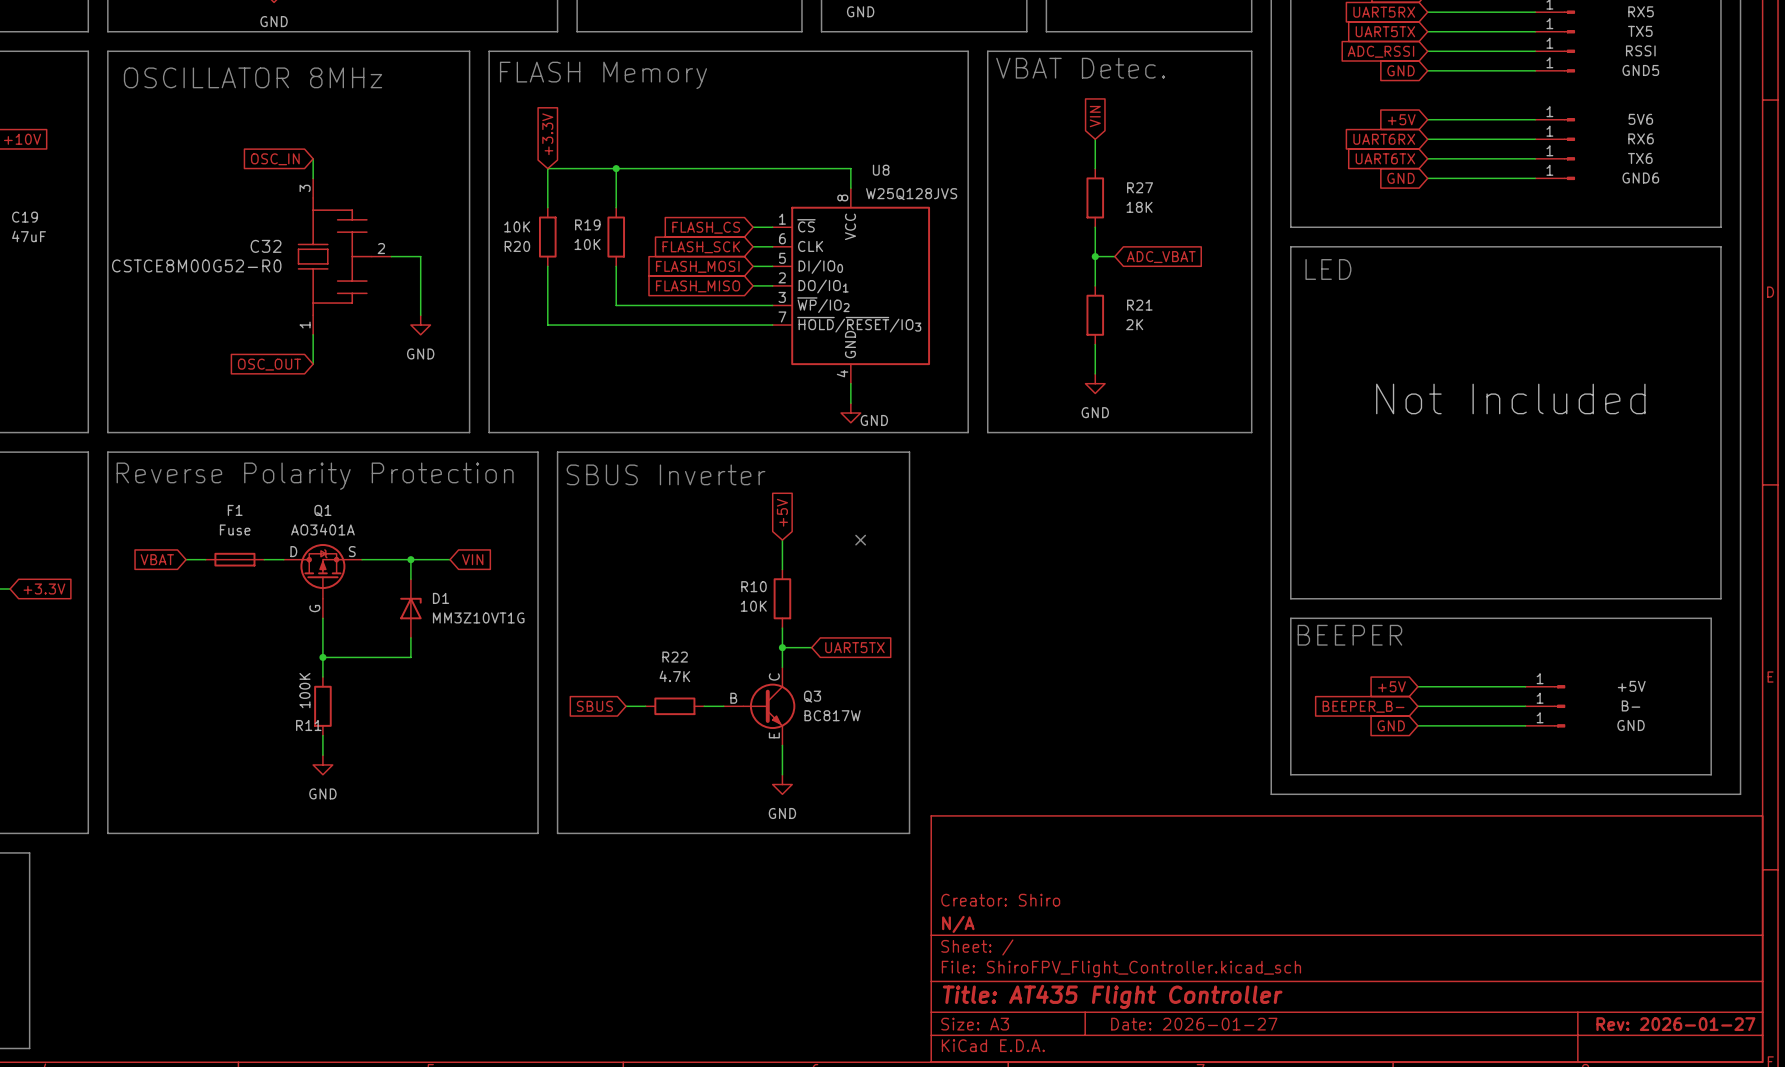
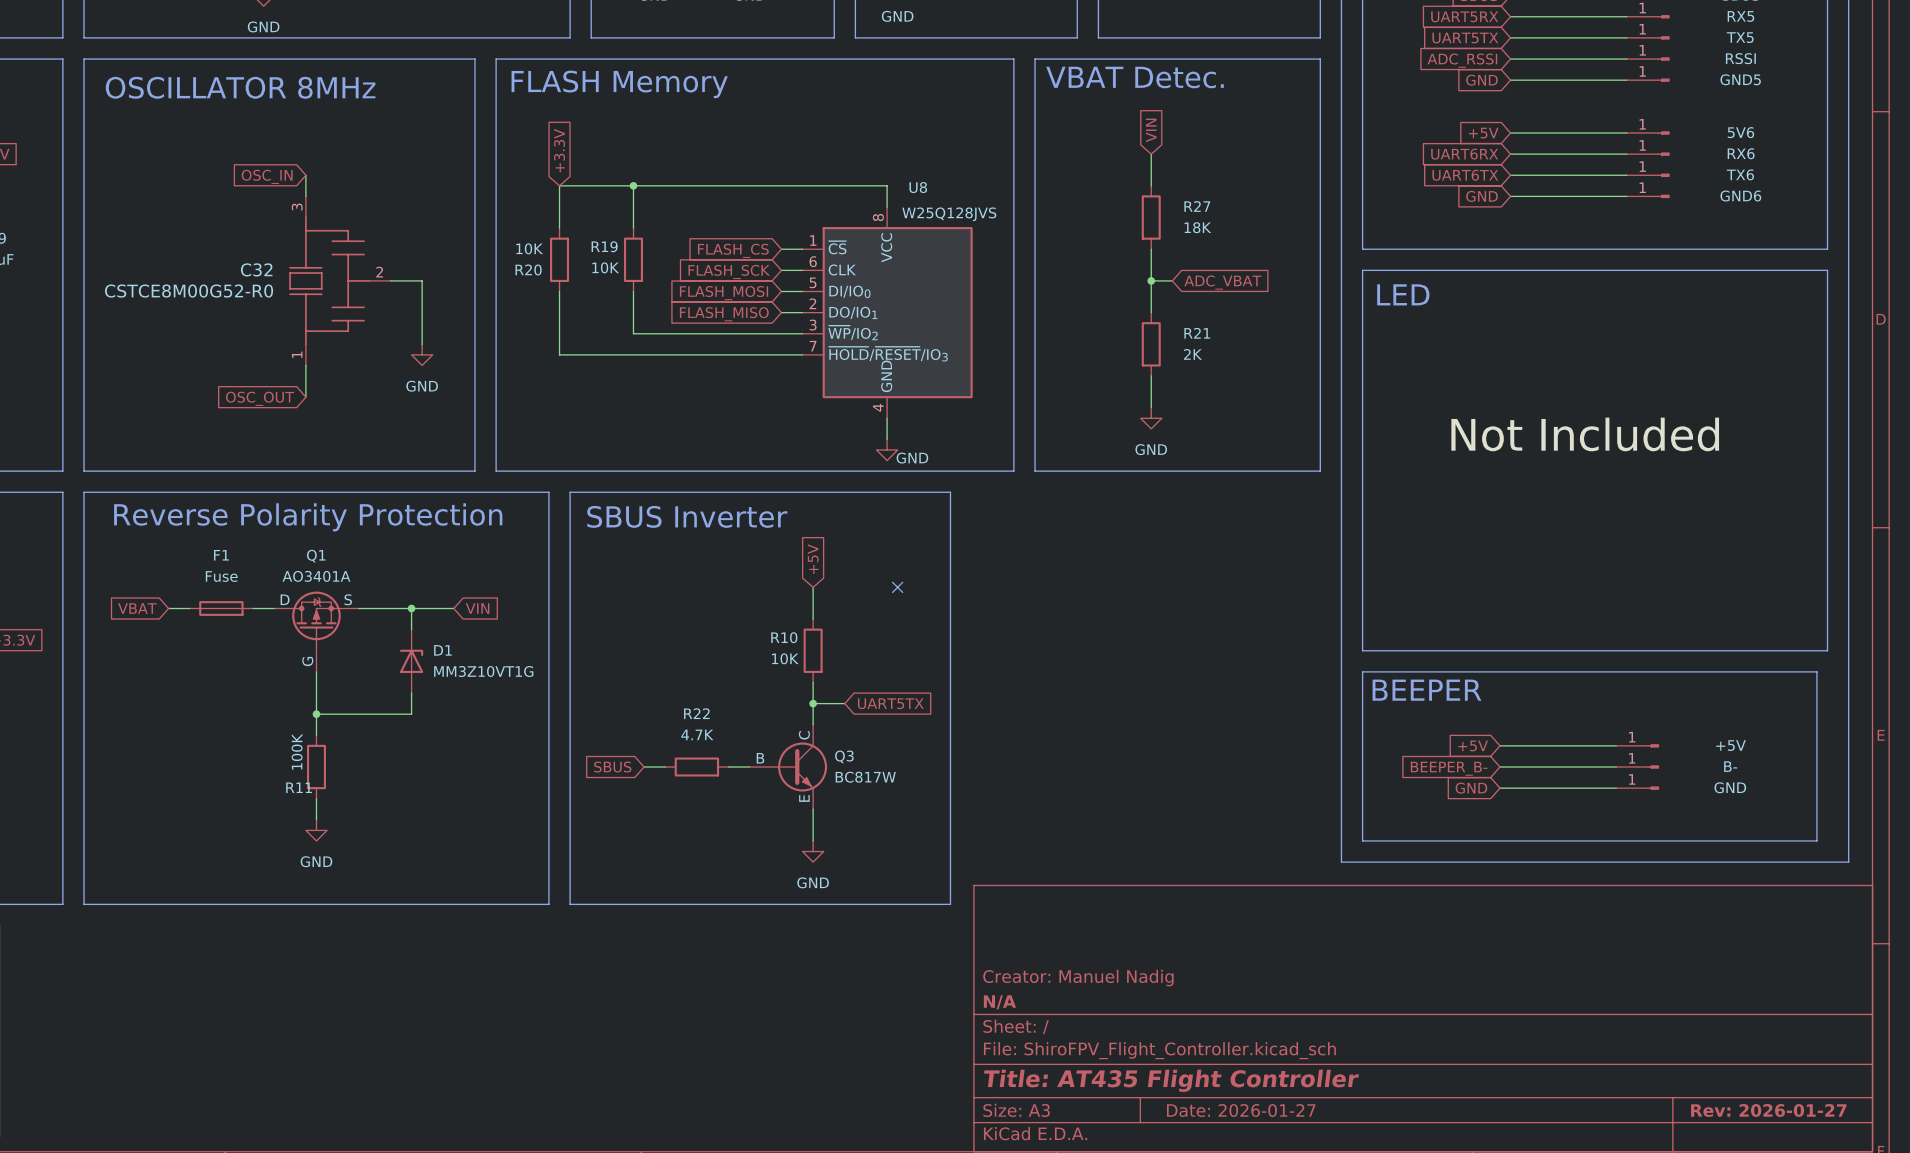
title block: Creator: Shiro (1000, 900) -> Creator: Manuel Nadig (1078, 978)

